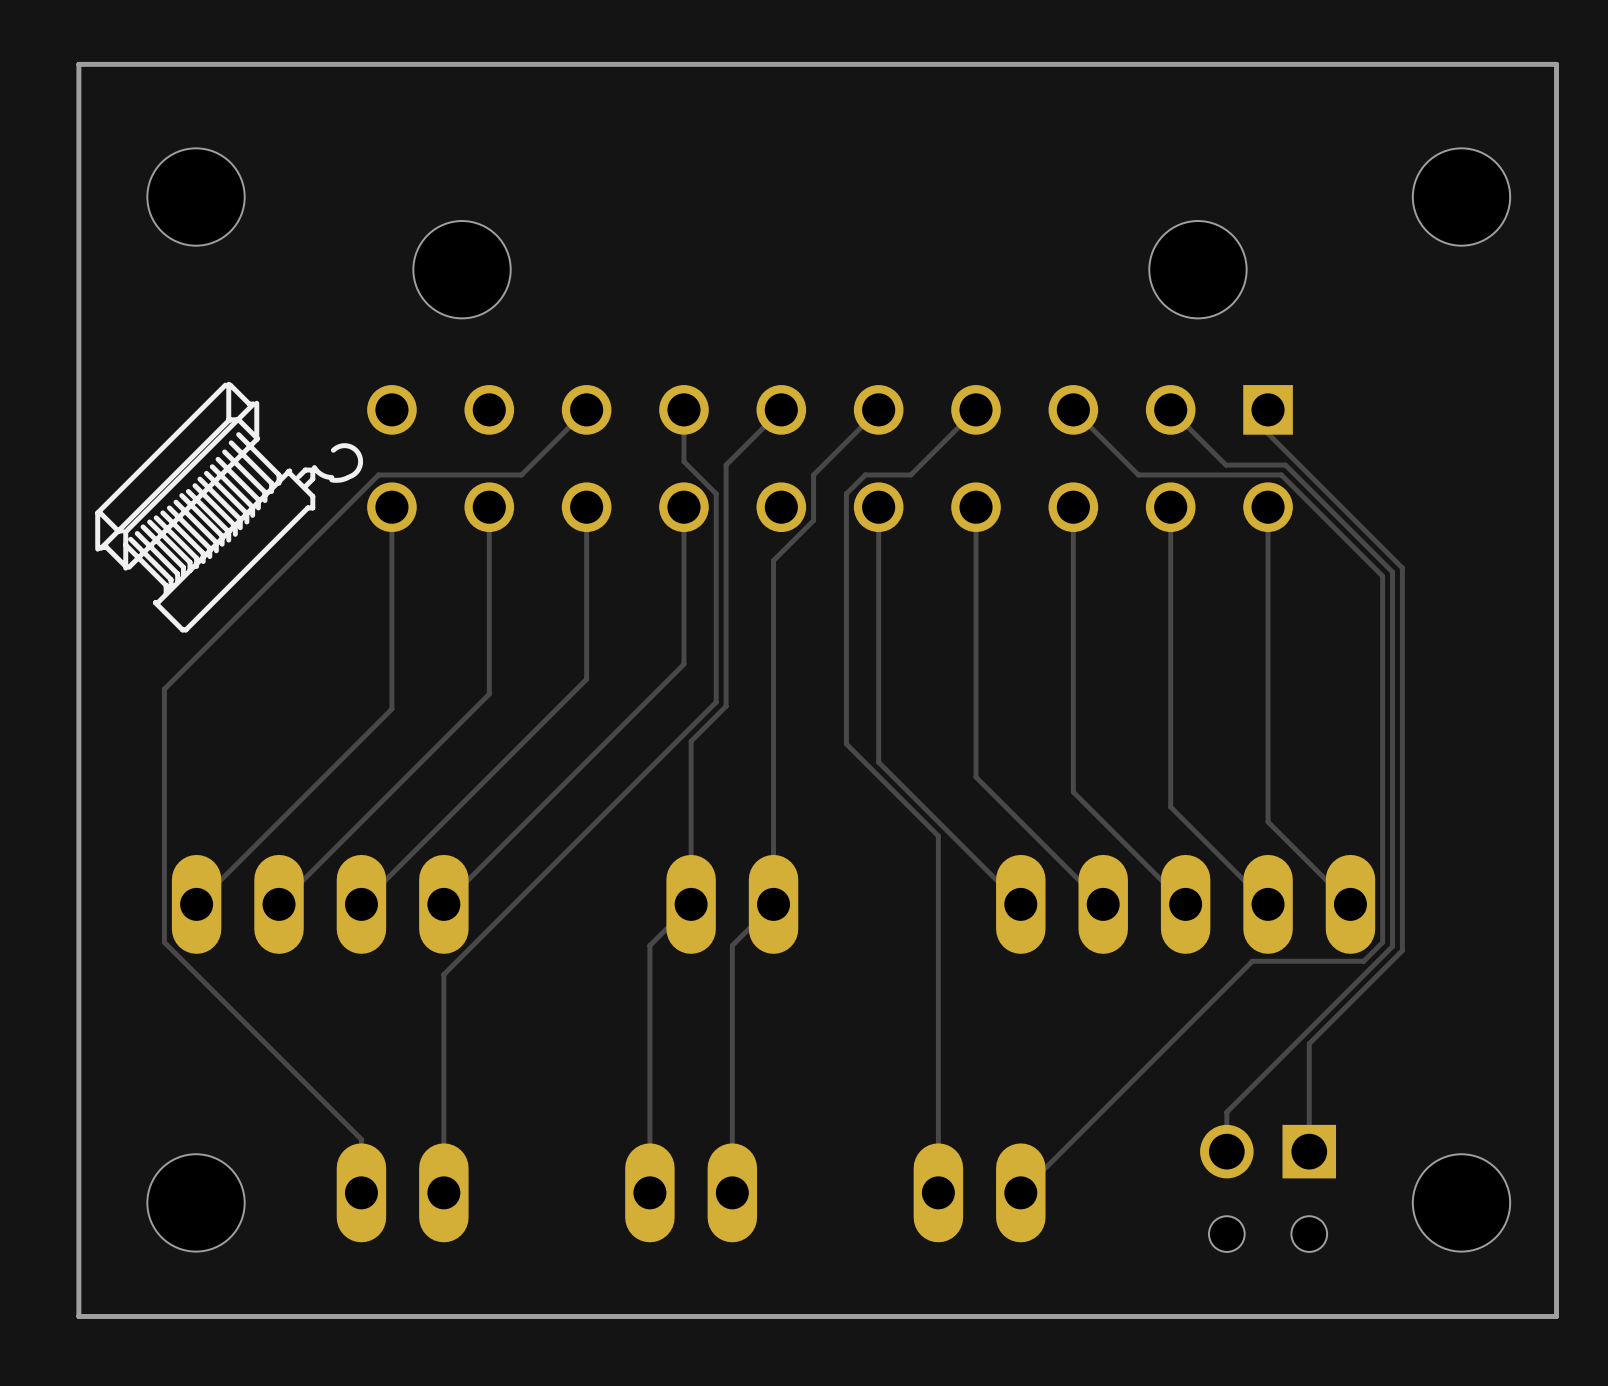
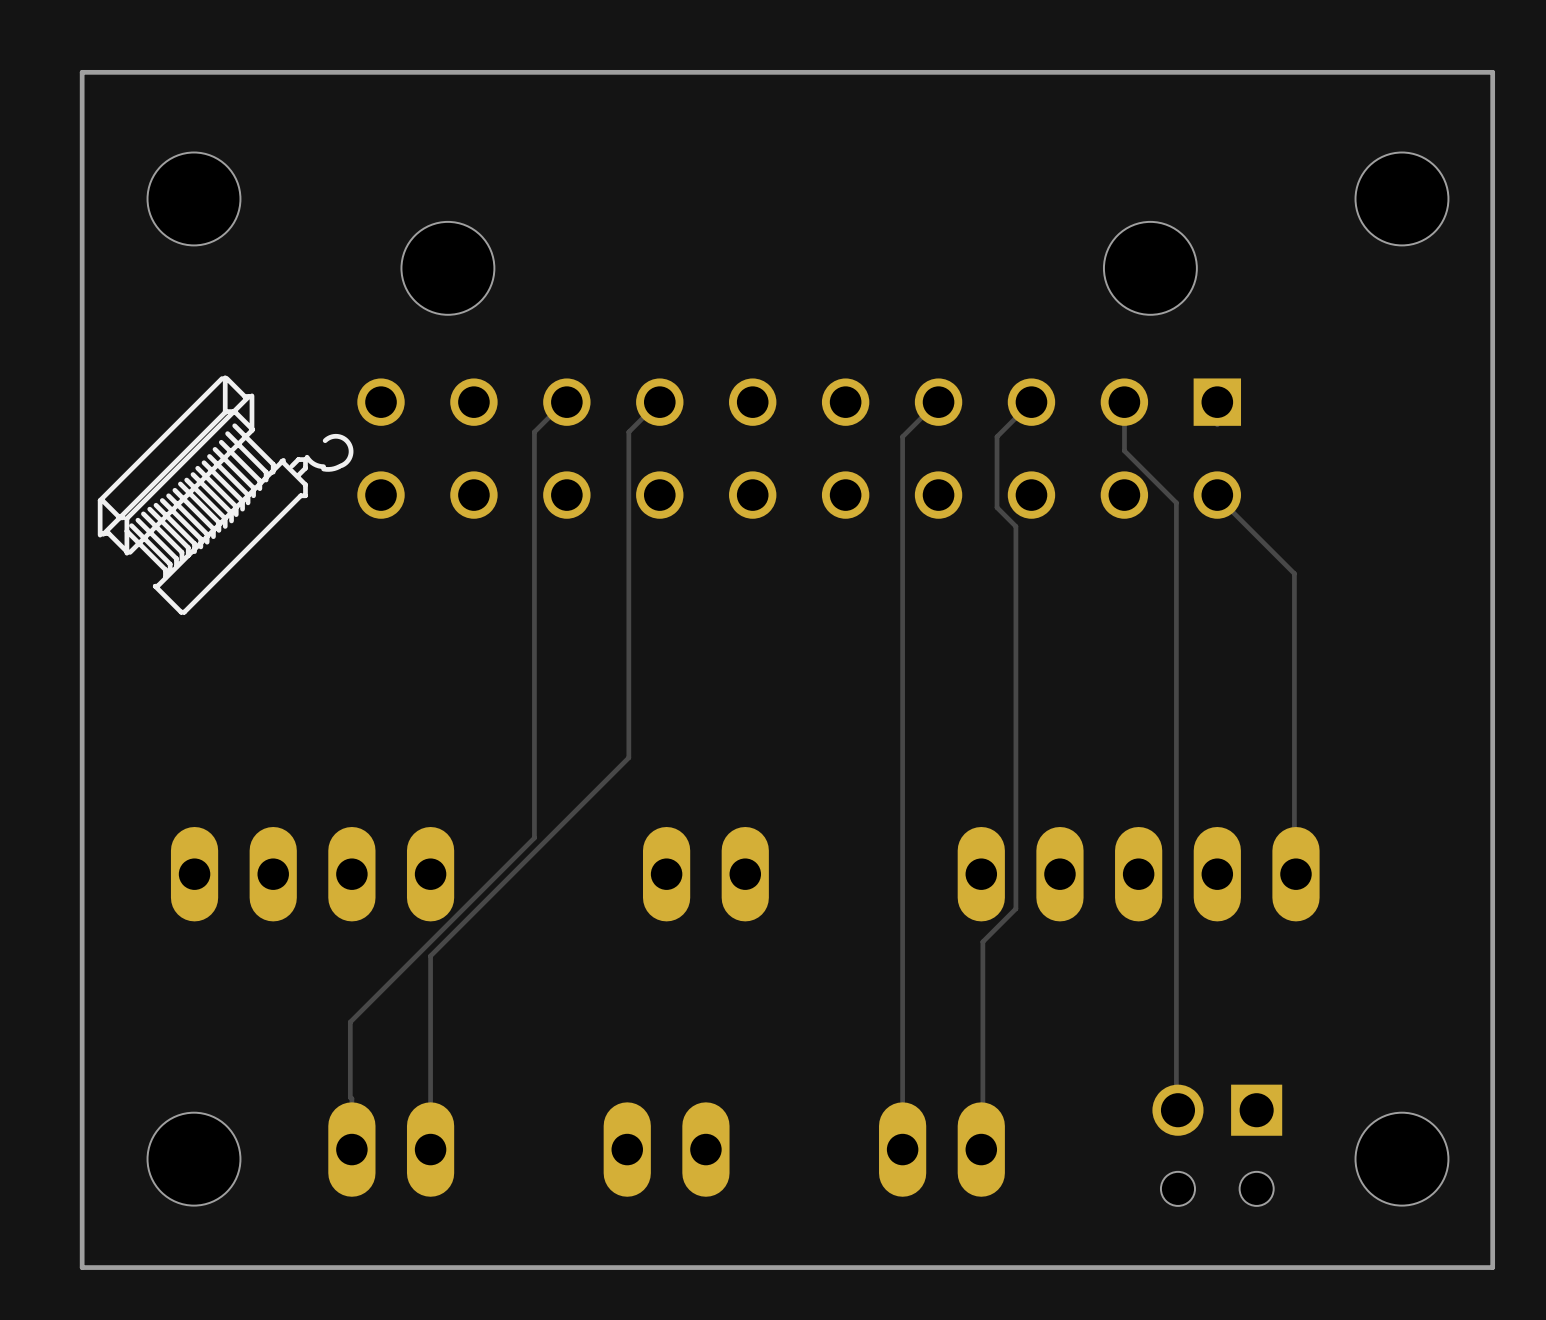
track: (586, 409) (521, 474) (378, 474) (164, 689) (164, 942) (361, 1139) -> (566, 402) (562, 403) (534, 432) (534, 838) (350, 1022) (350, 1097) (351, 1098)
track: (683, 409) (683, 461) (716, 493) (716, 702) (443, 974) (443, 990) -> (659, 402) (628, 432) (628, 757) (430, 956)
track: (781, 409) (726, 465) (726, 706) (691, 741) (691, 904) (649, 945) (649, 1192) -> none
track: (878, 409) (813, 474) (813, 520) (773, 560) (773, 904) (732, 945) (732, 1192) -> none
track: (976, 409) (910, 474) (865, 474) (846, 493) (846, 744) (938, 835) -> (938, 402) (902, 436) (902, 808)
track: (1073, 409) (1138, 474) (1281, 474) (1382, 576) (1382, 942) (1363, 961) (1252, 961) (1020, 1192) -> (1031, 402) (997, 436) (997, 507) (1015, 526) (1015, 908) (982, 941) (982, 1149) (981, 1149)
track: (1170, 409) (1225, 465) (1285, 465) (1392, 572) (1392, 946) (1226, 1112) (1226, 1151) -> (1124, 402) (1124, 450) (1176, 502) (1176, 1107) (1177, 1110)
track: (1268, 433) (1402, 567) (1402, 950) (1309, 1043) (1309, 1151) -> none
track: (391, 507) (391, 709) (196, 904) -> none
track: (489, 507) (489, 694) (279, 904) -> none
track: (586, 507) (586, 679) (361, 904) -> none
track: (683, 507) (683, 664) (443, 904) -> none
track: (878, 507) (878, 762) (1020, 904) -> none
track: (976, 507) (976, 777) (1103, 904) -> none
track: (1073, 507) (1073, 792) (1185, 904) -> none
track: (1170, 507) (1170, 807) (1268, 904) -> none
track: (1268, 507) (1268, 821) (1350, 904) -> (1217, 495) (1294, 573) (1294, 871) (1295, 874)

